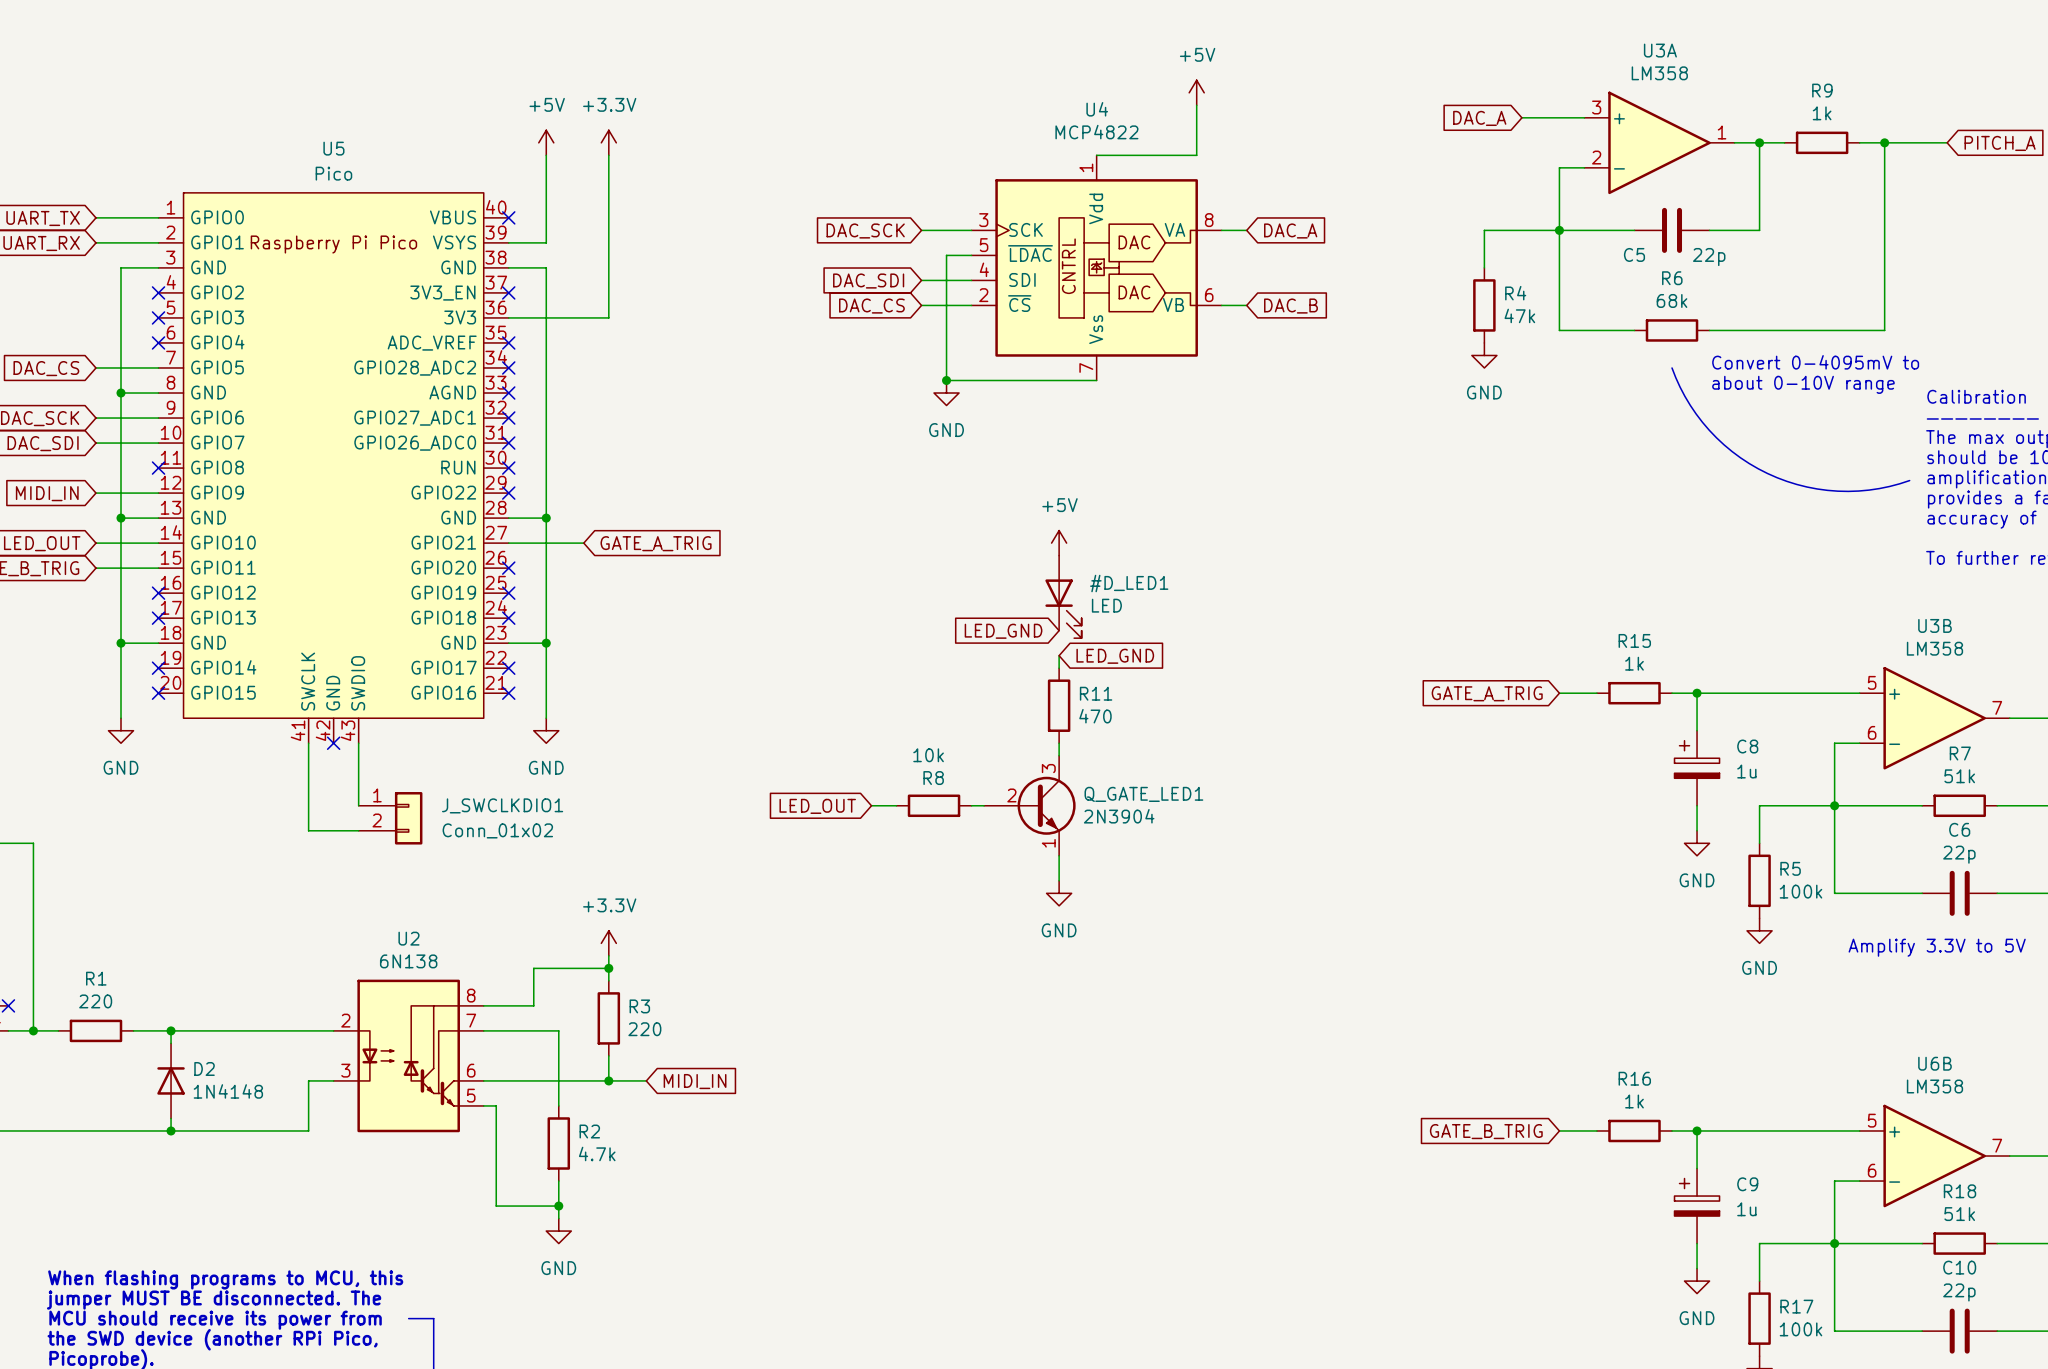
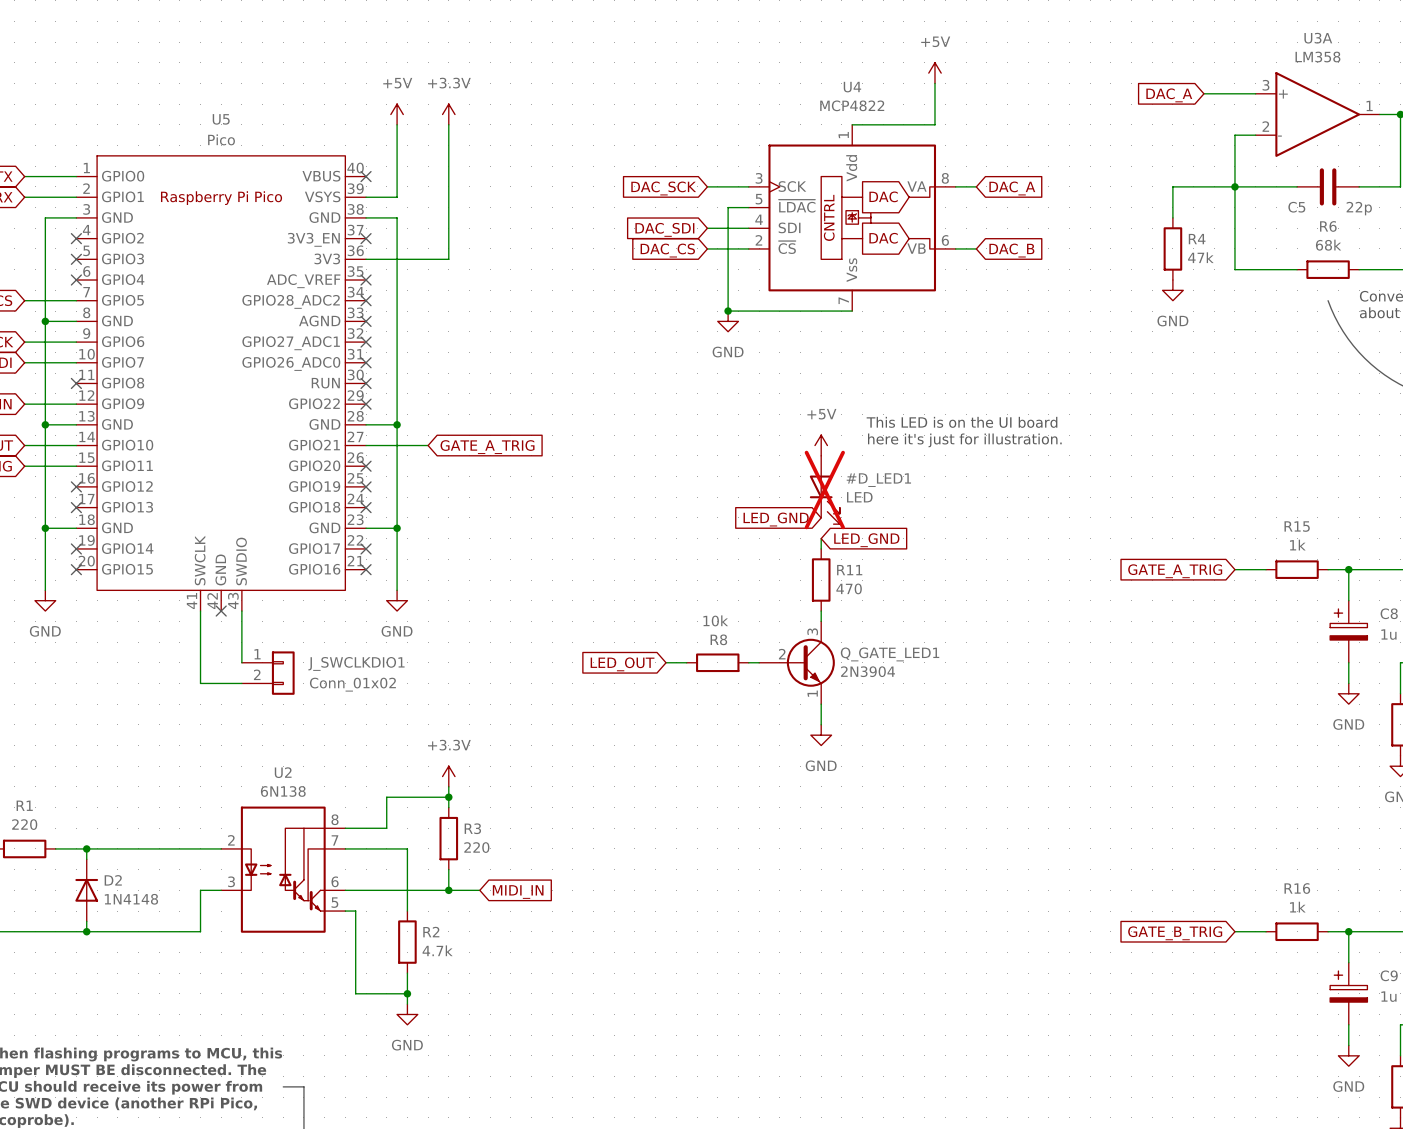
text: none -> This LED is on the UI board (962, 422)
text: none -> here it's just for illustration. (964, 440)
#D_LED1 do-not-place cross: none -> (824, 490)

